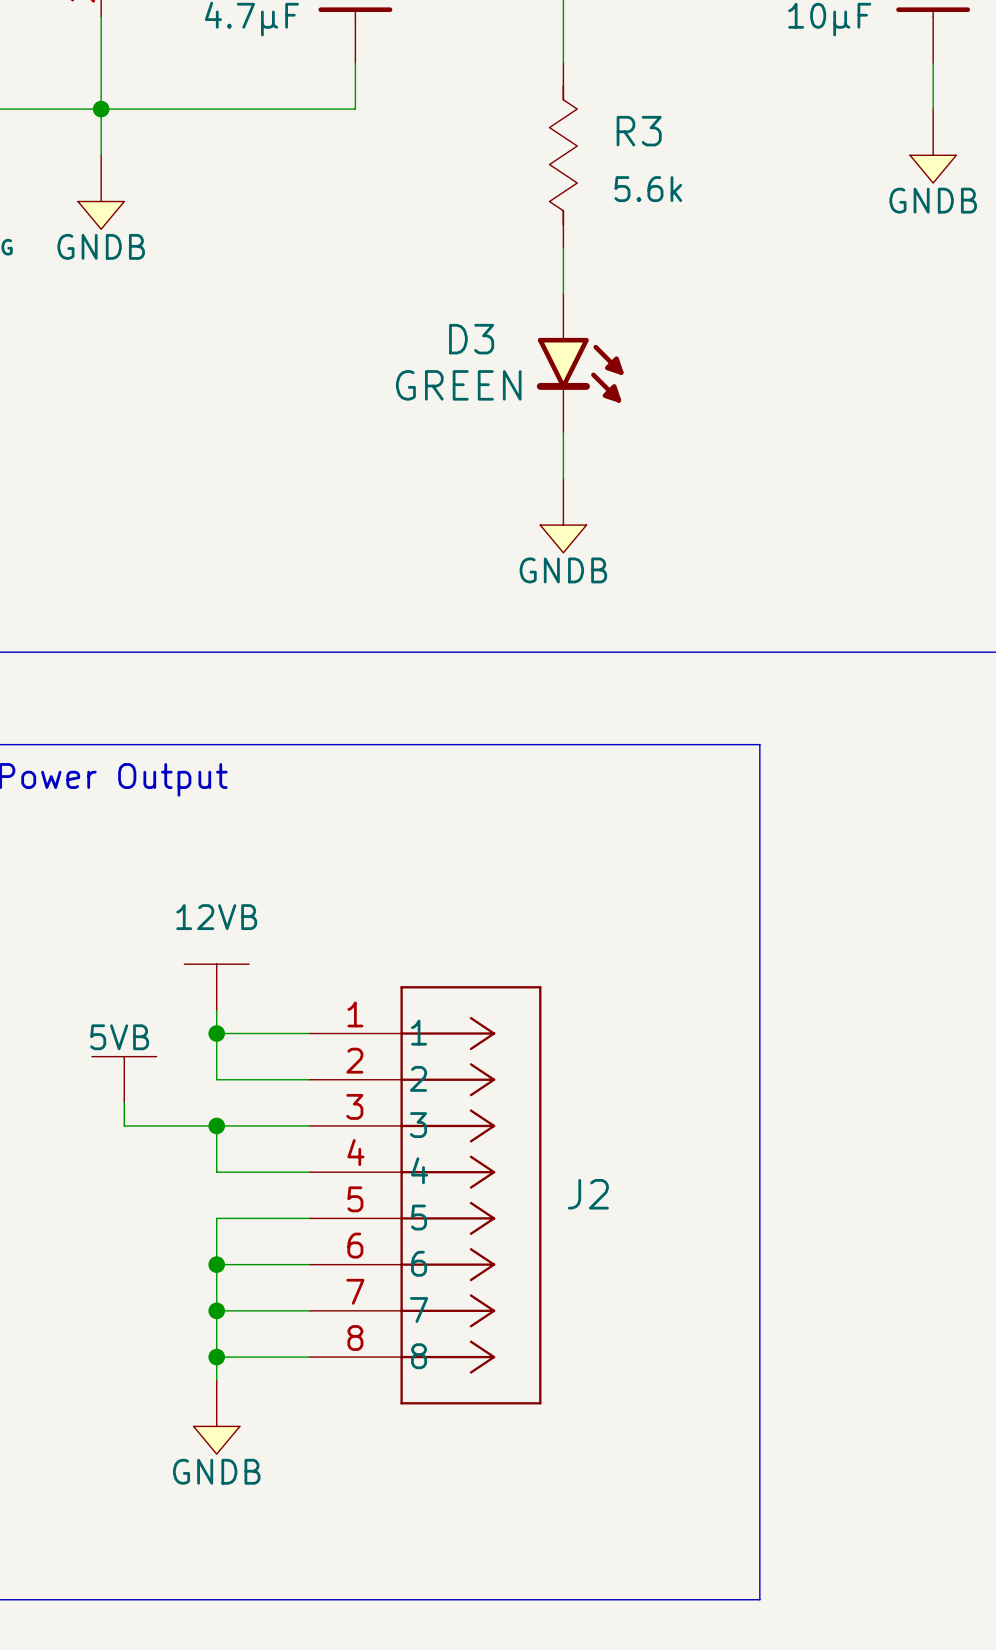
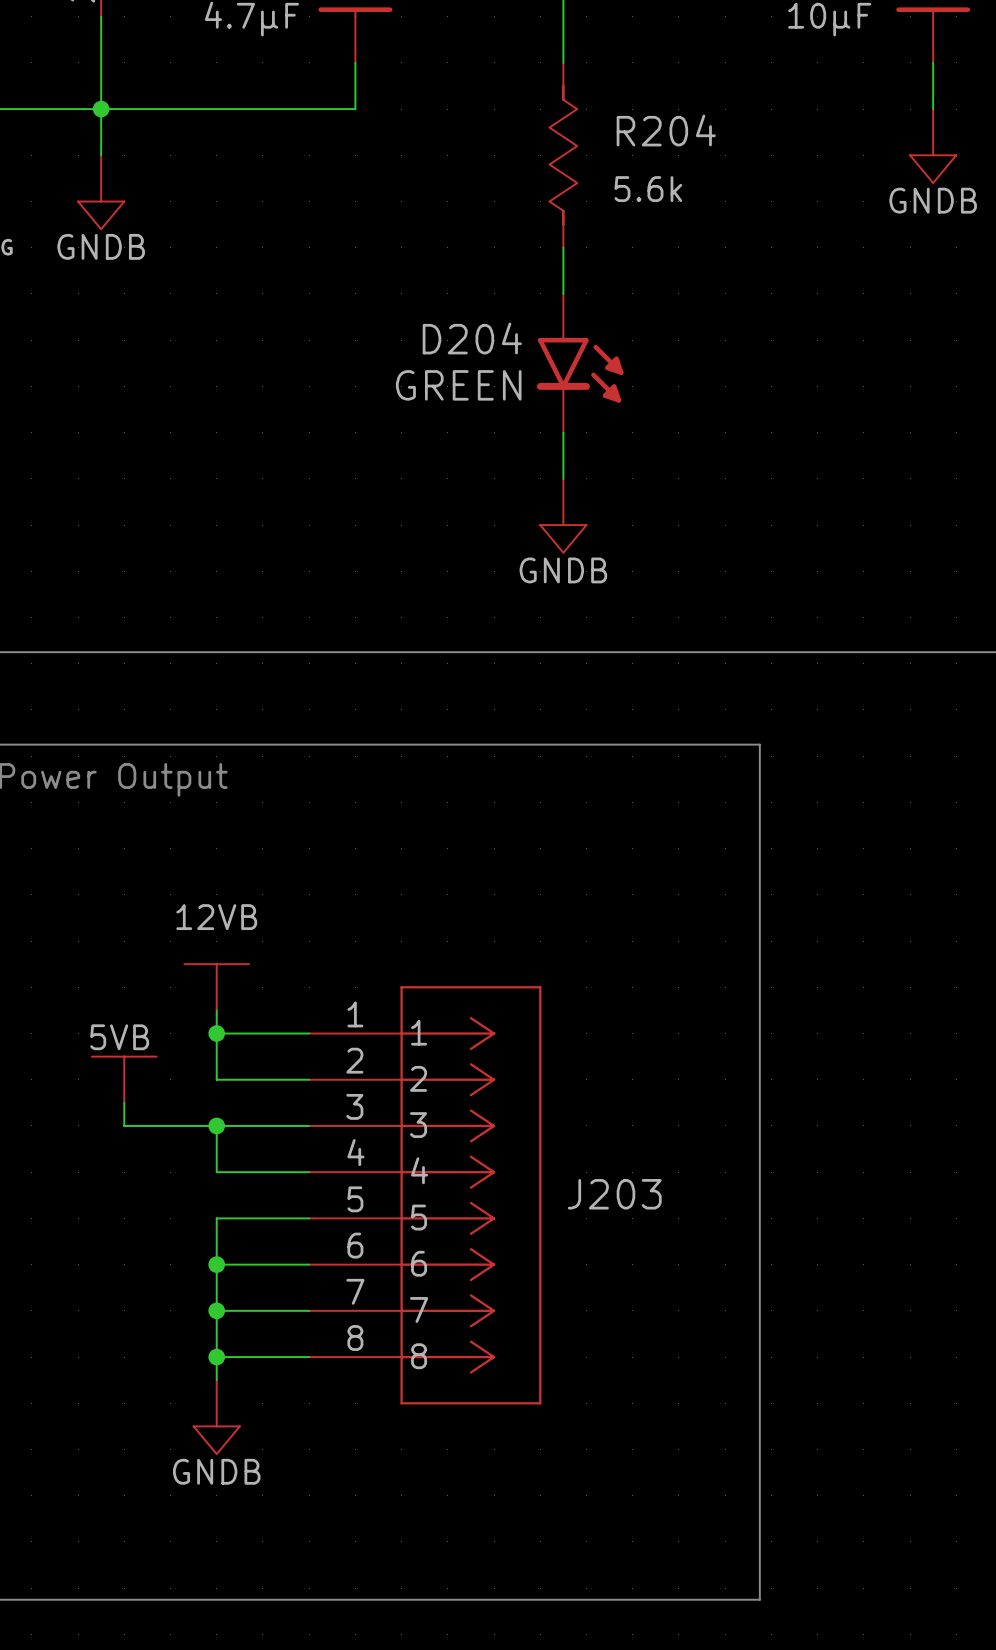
R3 name: R3 (639, 131) -> R204 (666, 130)
D3 name: D3 (471, 339) -> D204 (472, 338)
J2 name: J2 (588, 1194) -> J203 (614, 1194)

